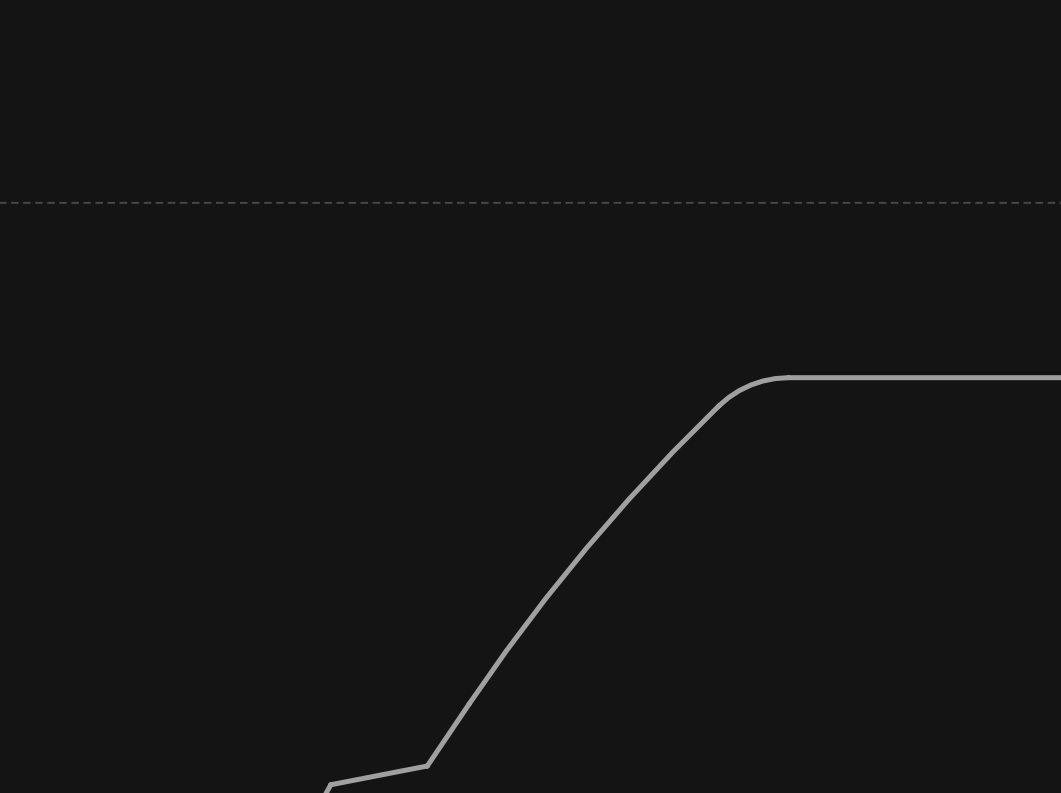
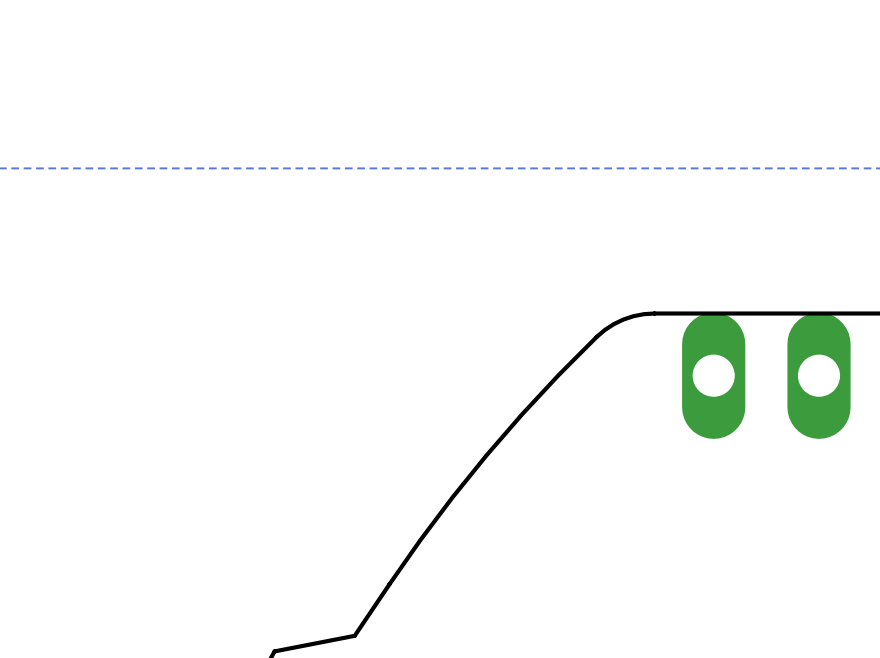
part: none -> (766, 375)

